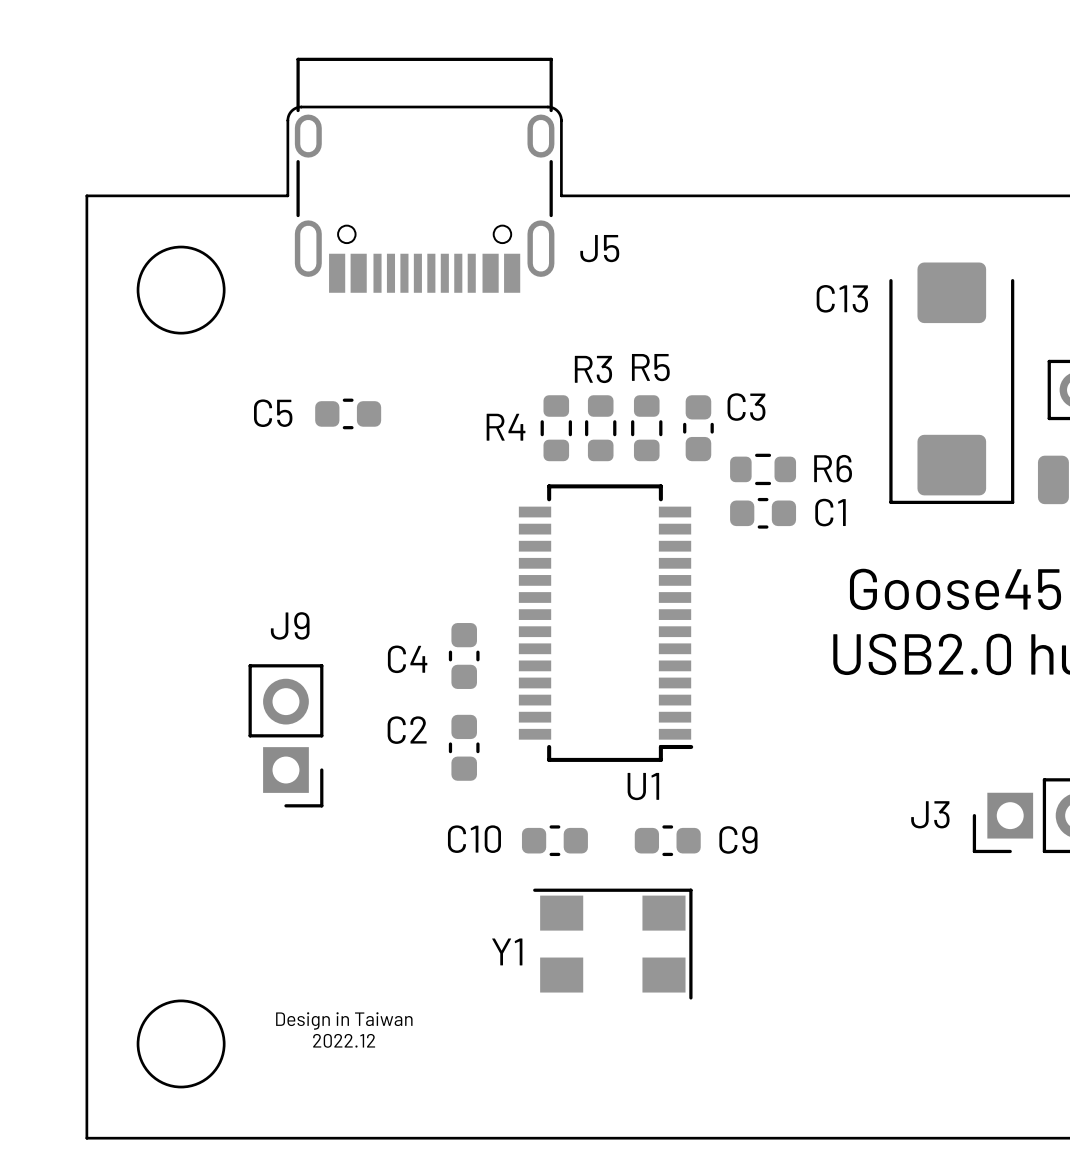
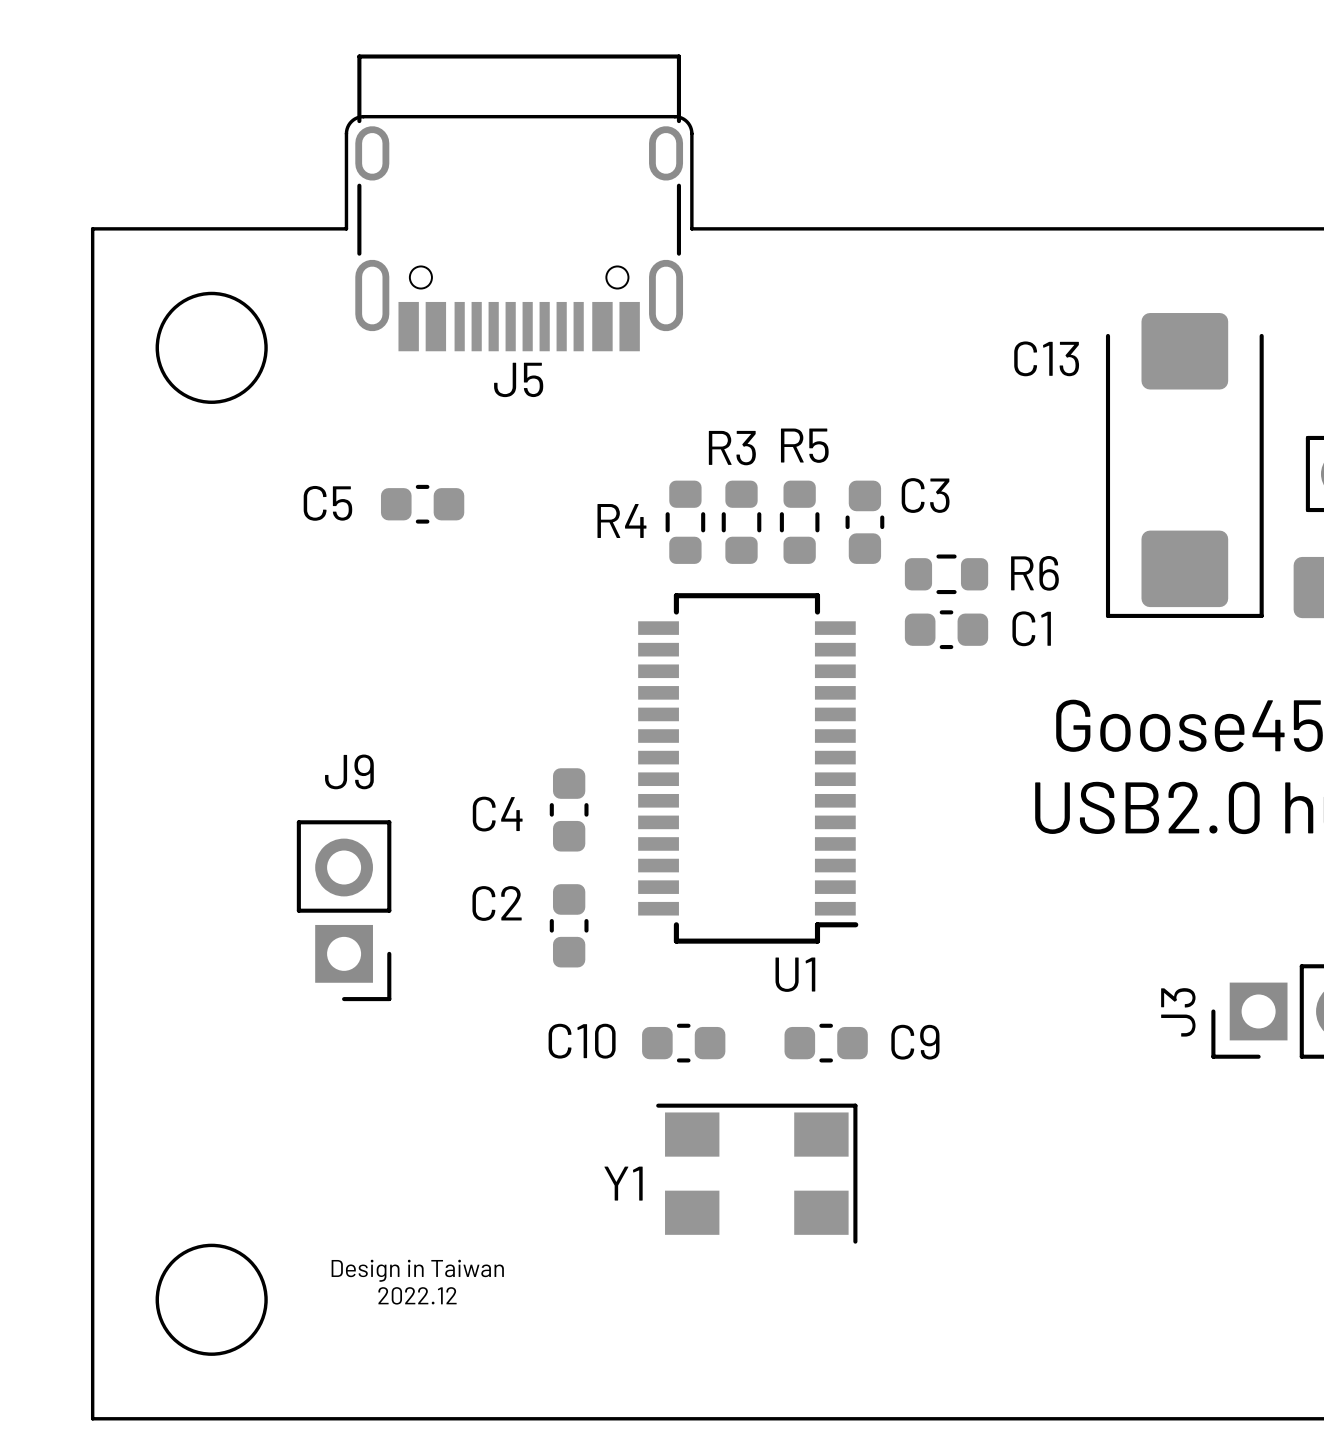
J5 name position: J5 (599, 248) -> J5 (518, 379)
J3 name rotation: 0° (930, 814) -> 90° counterclockwise (1178, 1012)

